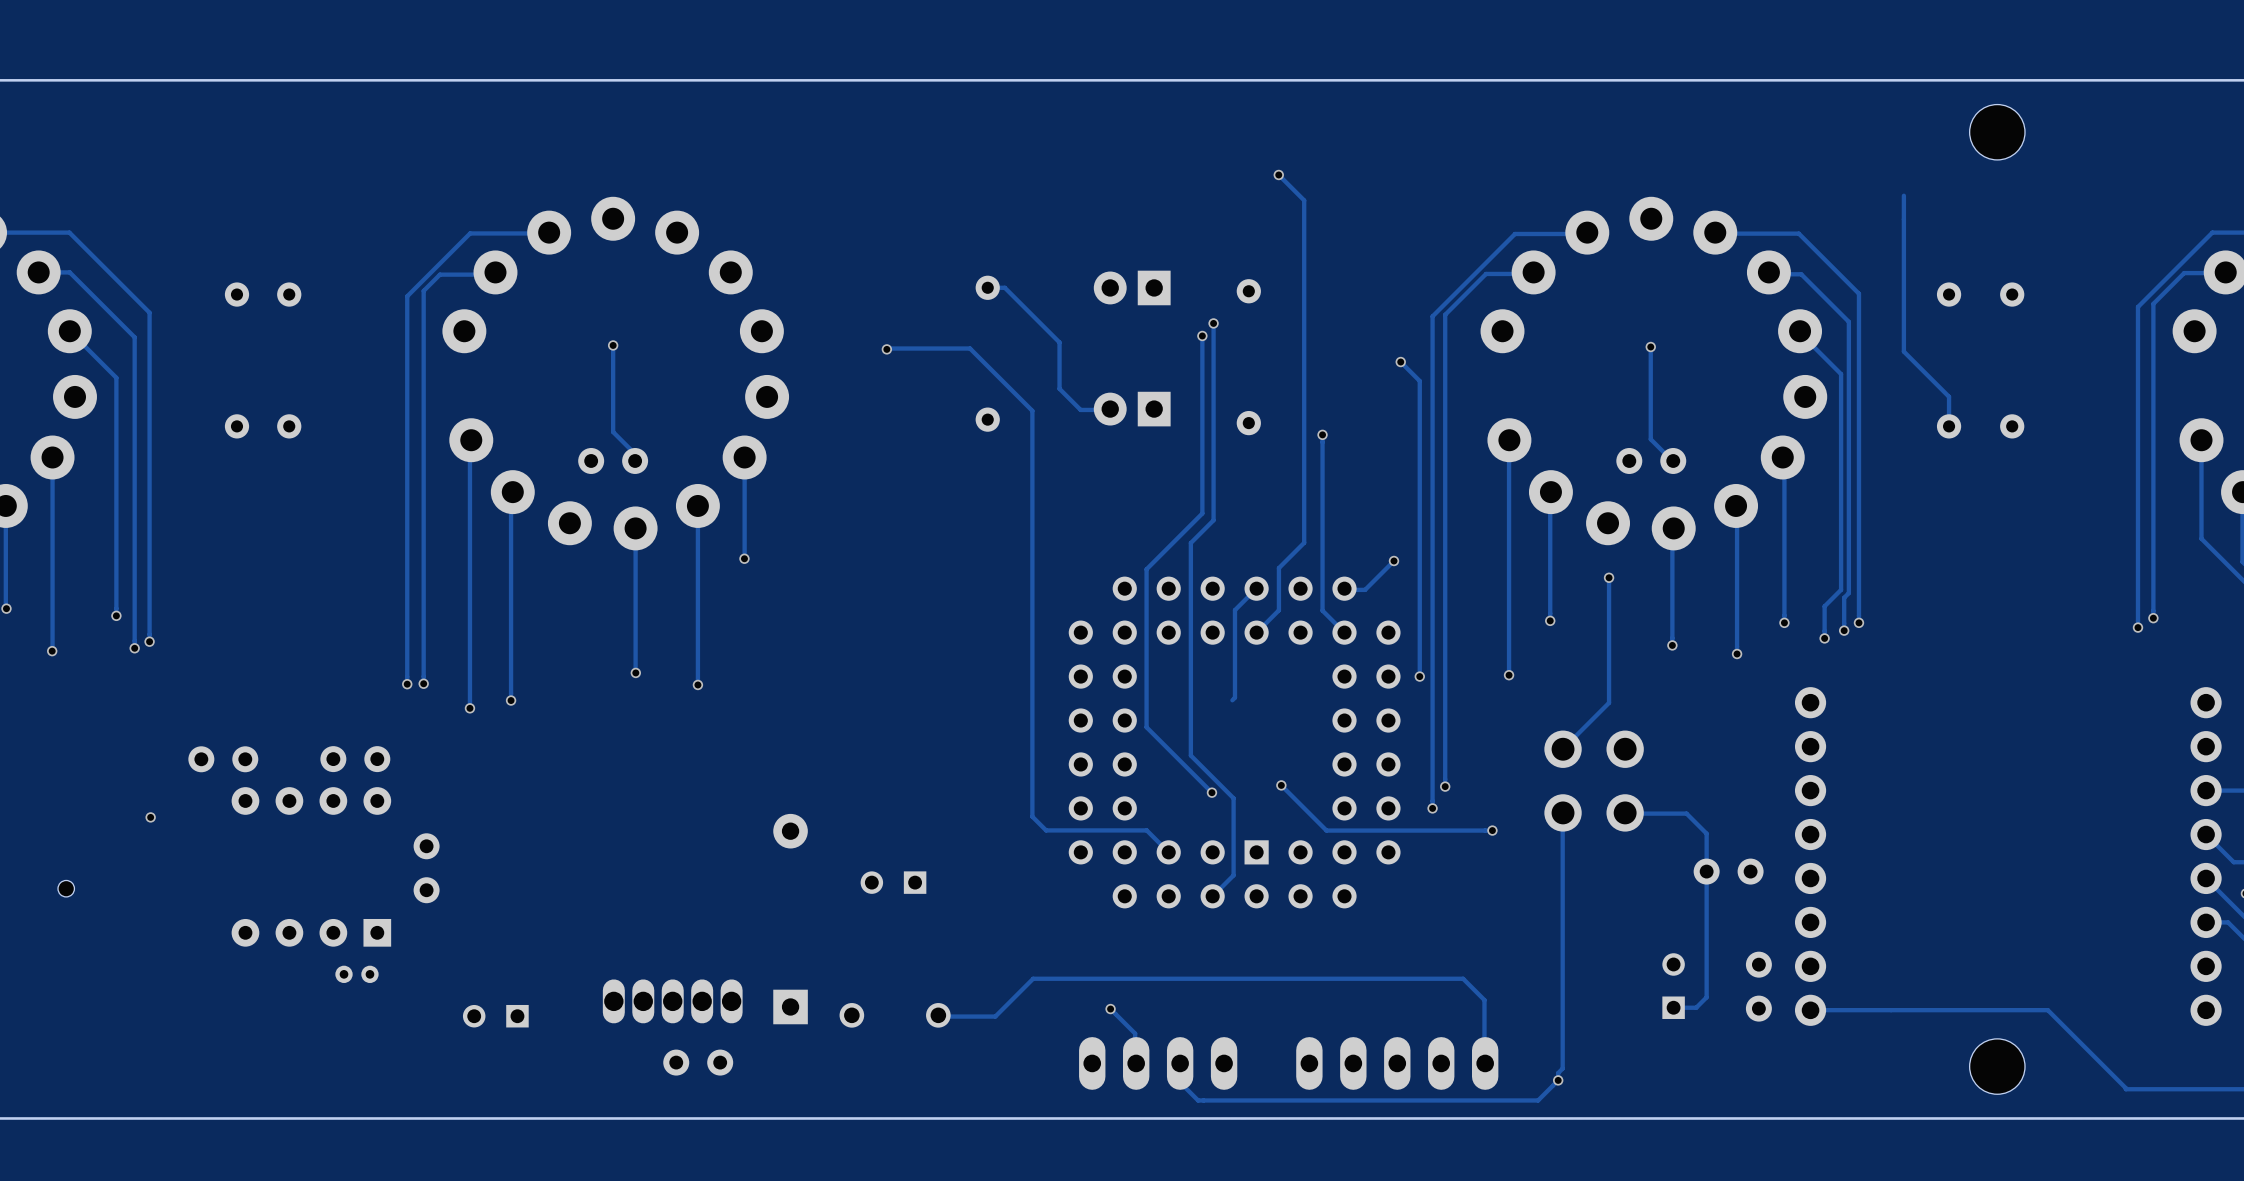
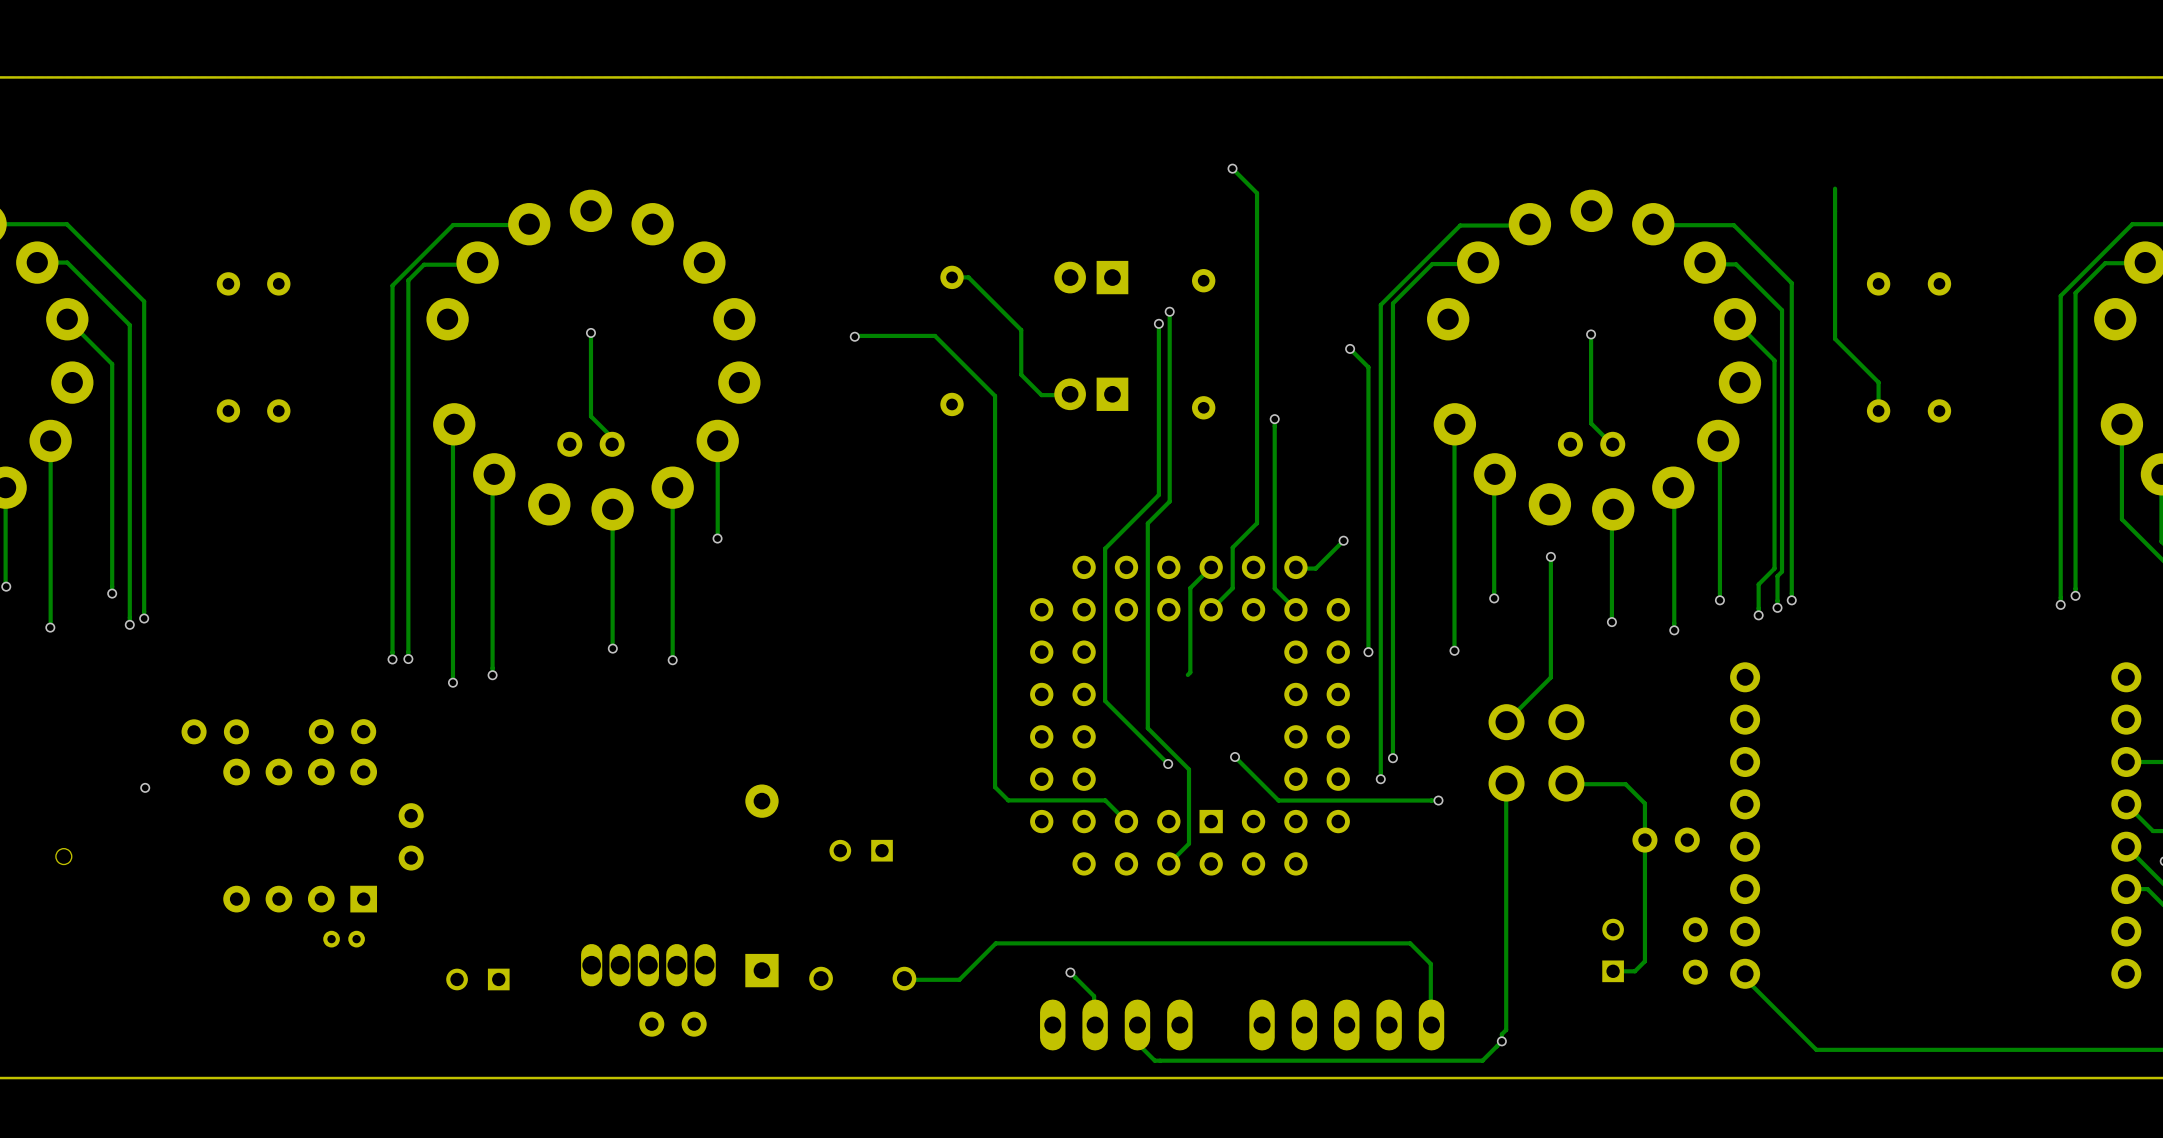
part: (1997, 132) -> none
track: (1810, 1010) (2047, 1010) (2125, 1089) -> (1744, 977) (1816, 1049) (2049, 1049)
part: (1997, 1066) -> none

